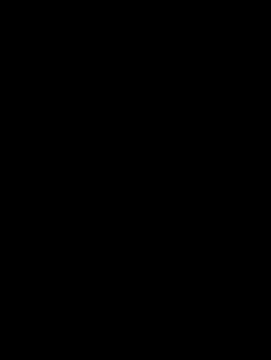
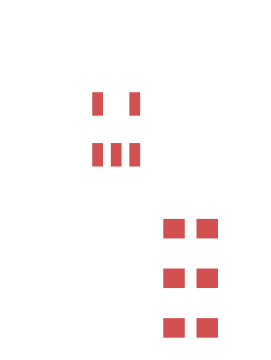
part: none -> (116, 129)
part: none -> (190, 228)
part: none -> (190, 278)
part: none -> (190, 327)

